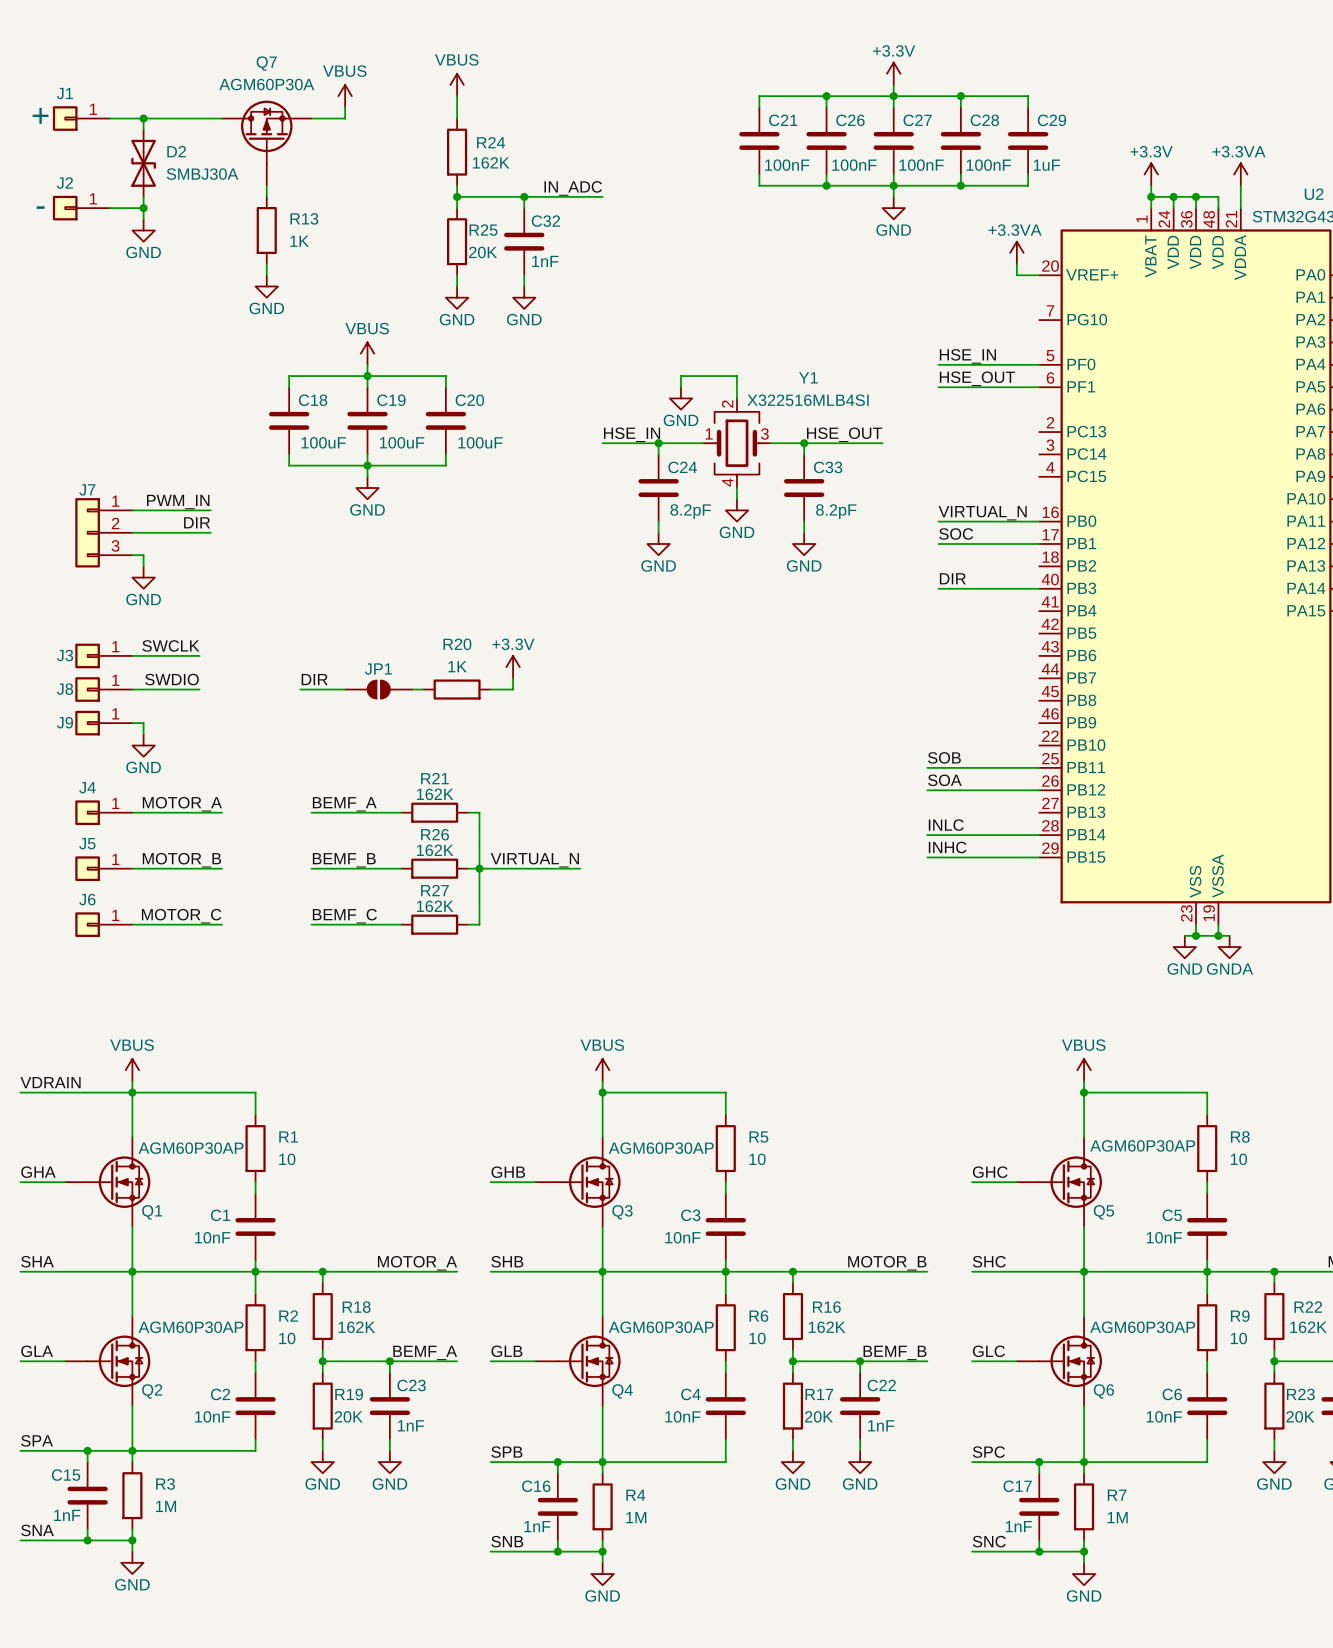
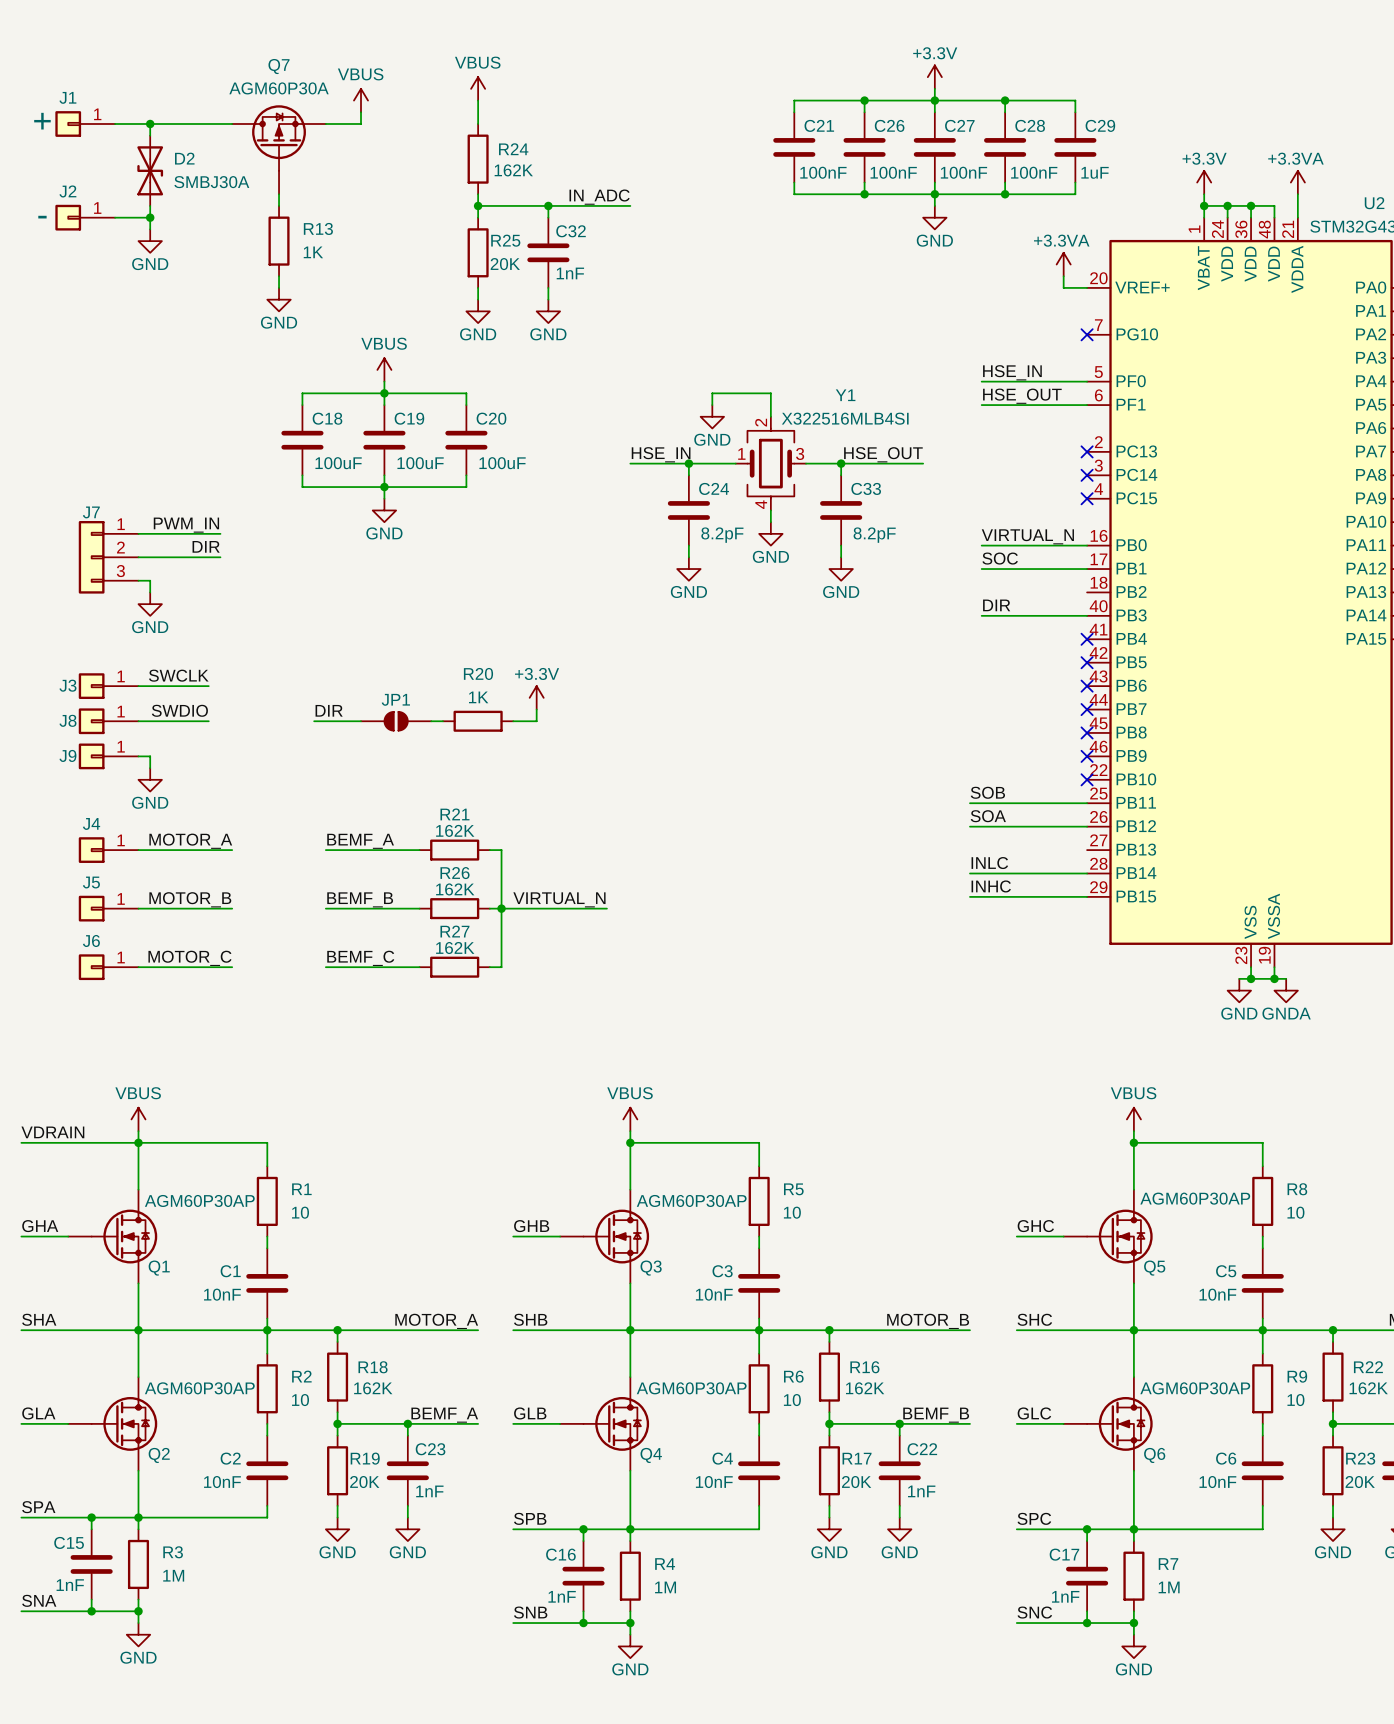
no-connect mark: none -> (1087, 334)
no-connect mark: none -> (1087, 451)
no-connect mark: none -> (1087, 475)
no-connect mark: none -> (1087, 498)
no-connect mark: none -> (1087, 639)
no-connect mark: none -> (1087, 662)
no-connect mark: none -> (1087, 686)
no-connect mark: none -> (1087, 709)
no-connect mark: none -> (1087, 732)
no-connect mark: none -> (1087, 756)
no-connect mark: none -> (1087, 779)

